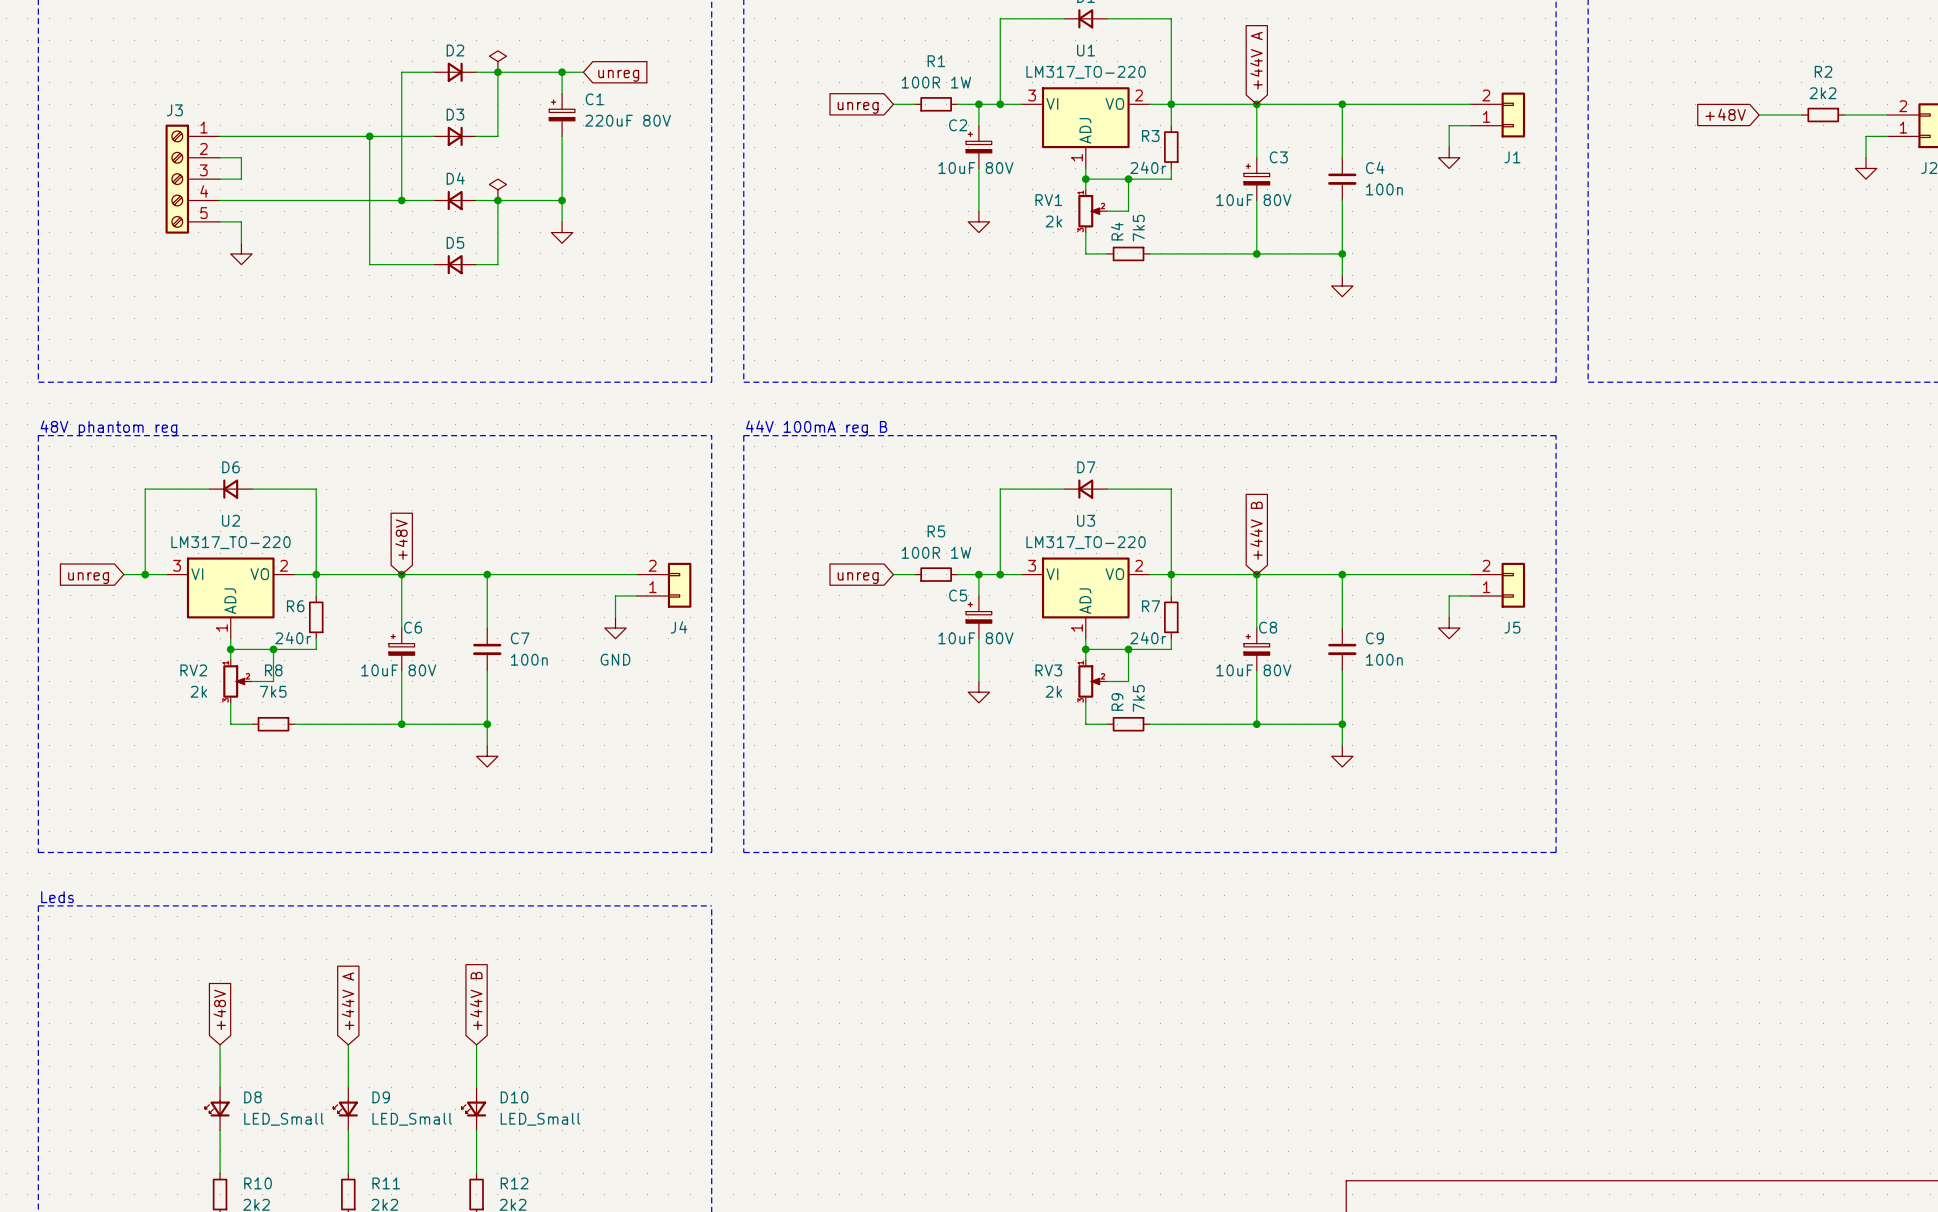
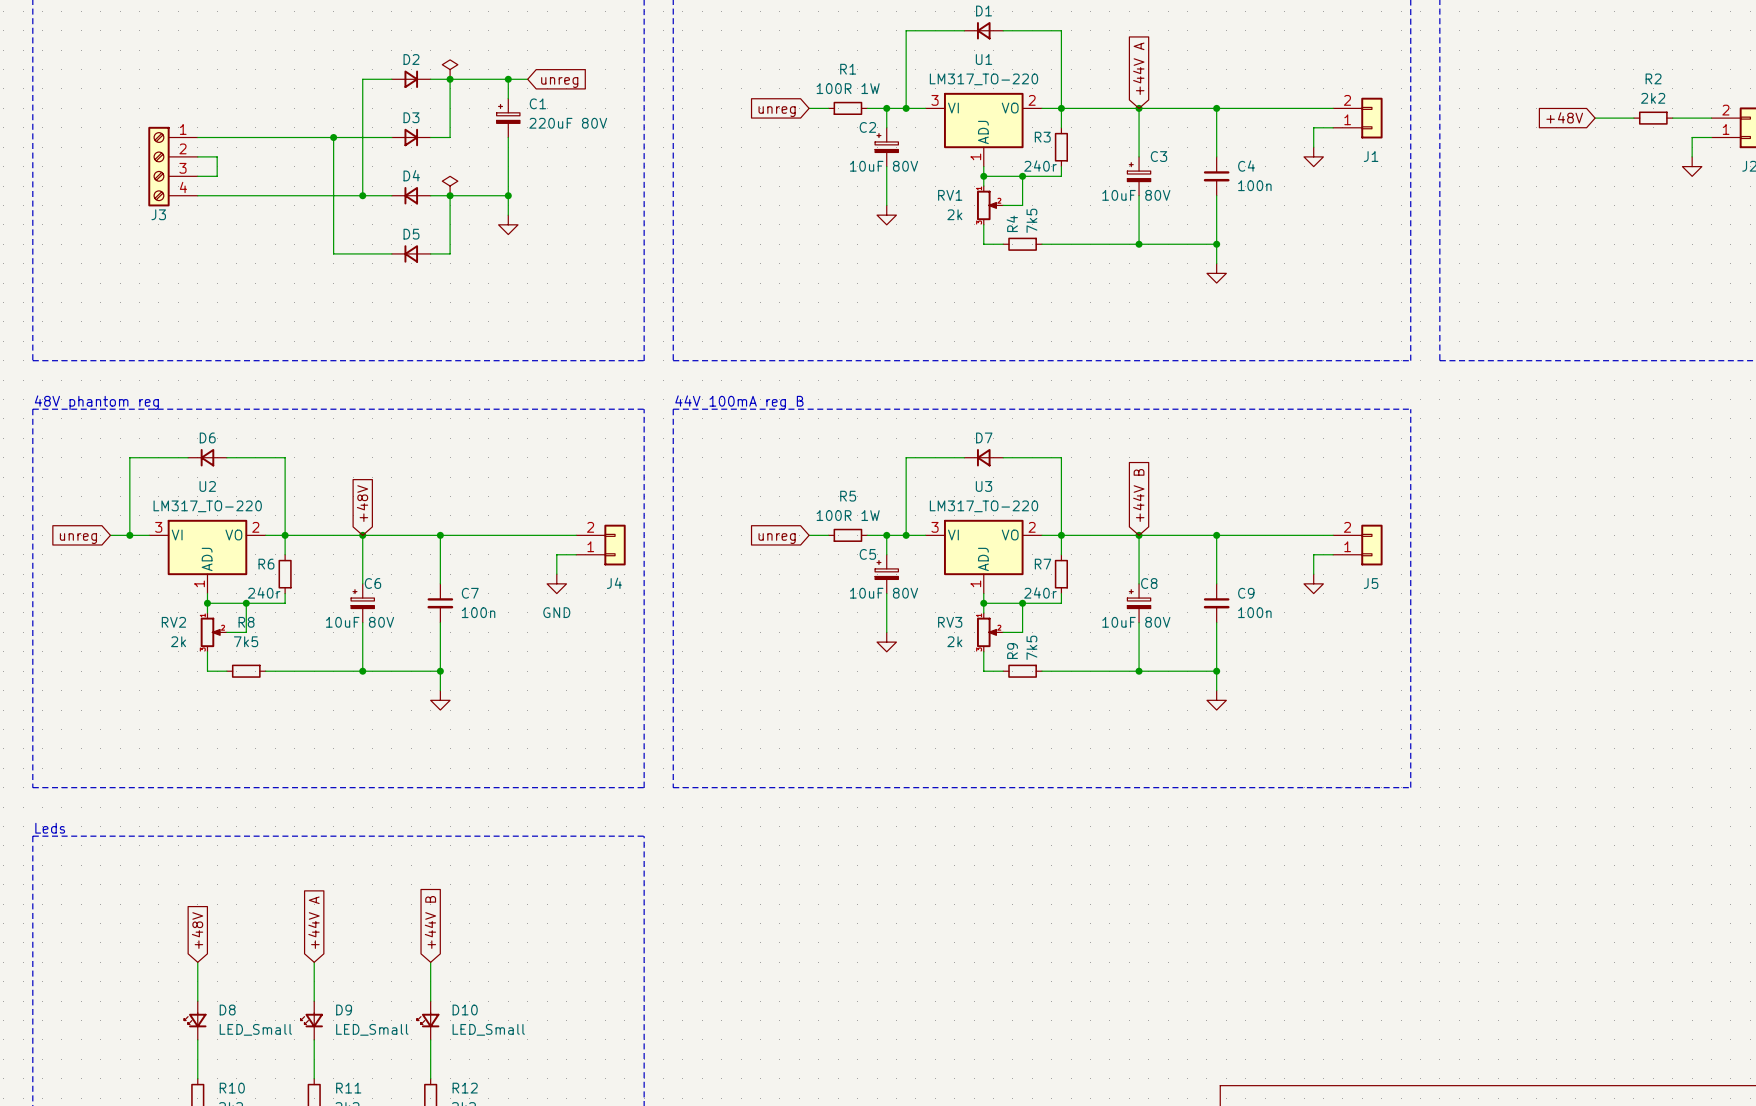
J3 name position: J3 (174, 110) -> J3 (158, 214)
J3 symbol: [165, 124, 221, 234] -> [148, 126, 198, 207]
wire: (220, 221) (241, 221) (241, 243) -> none
power symbol: (241, 253) -> none

